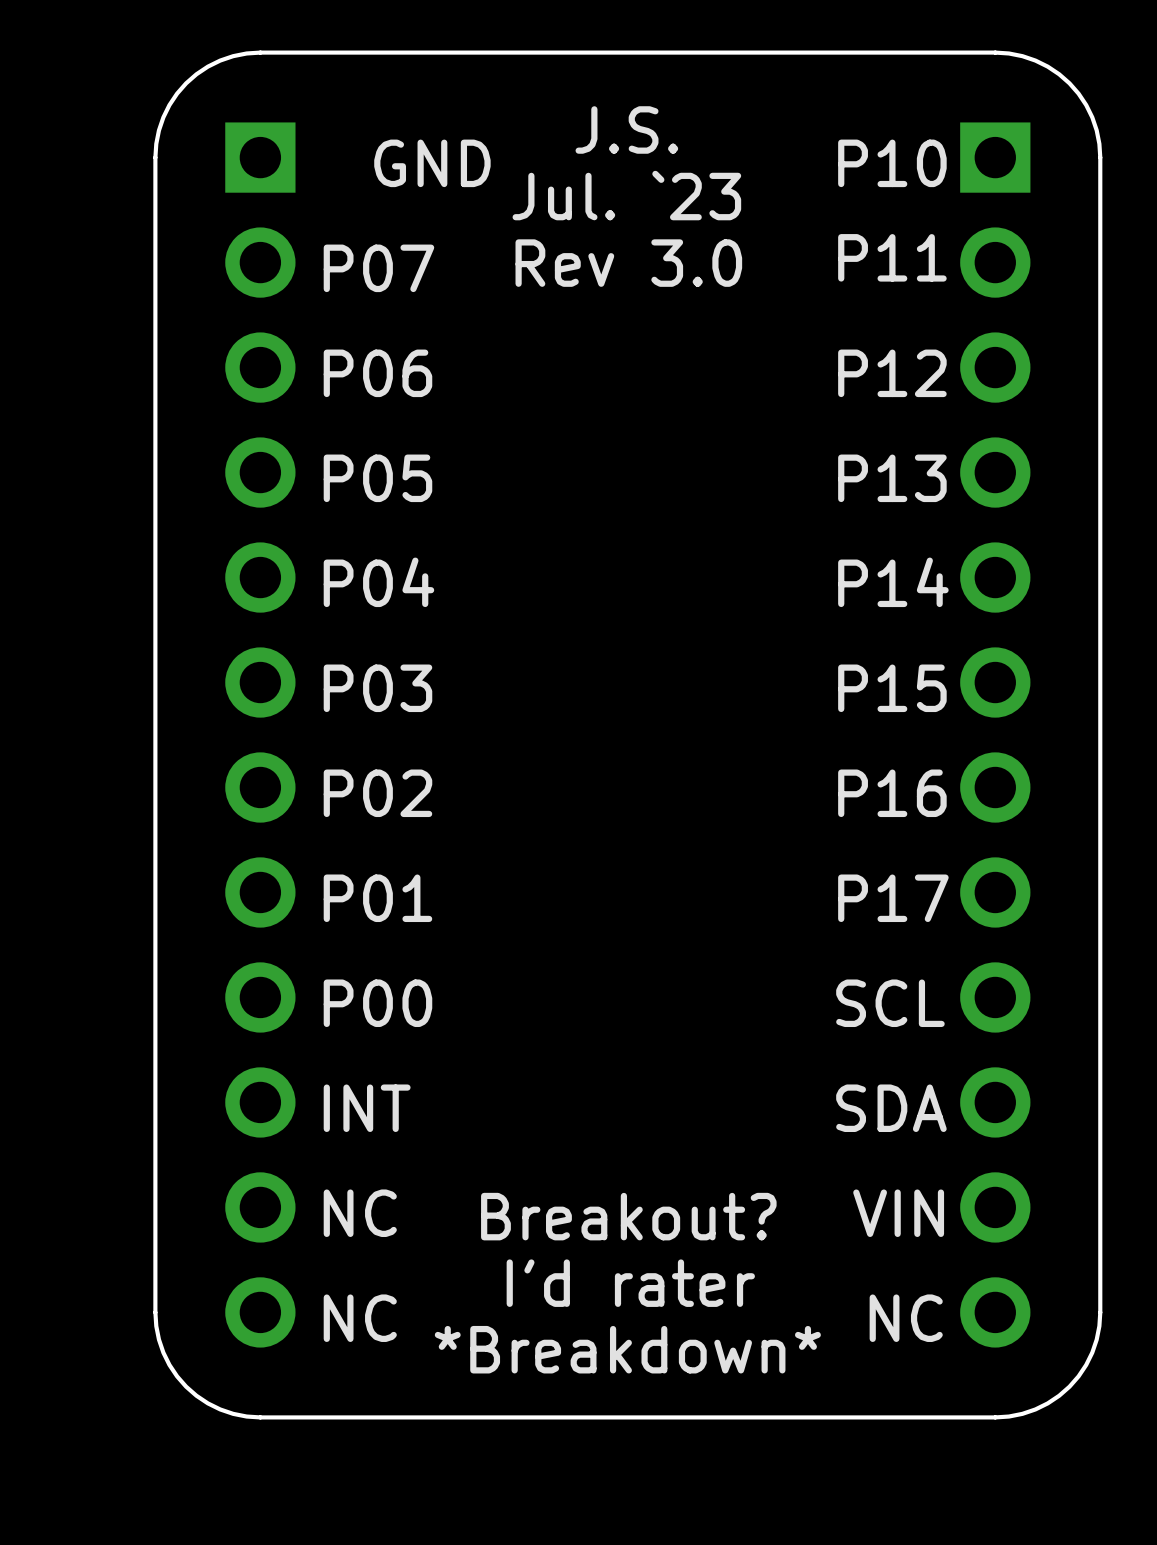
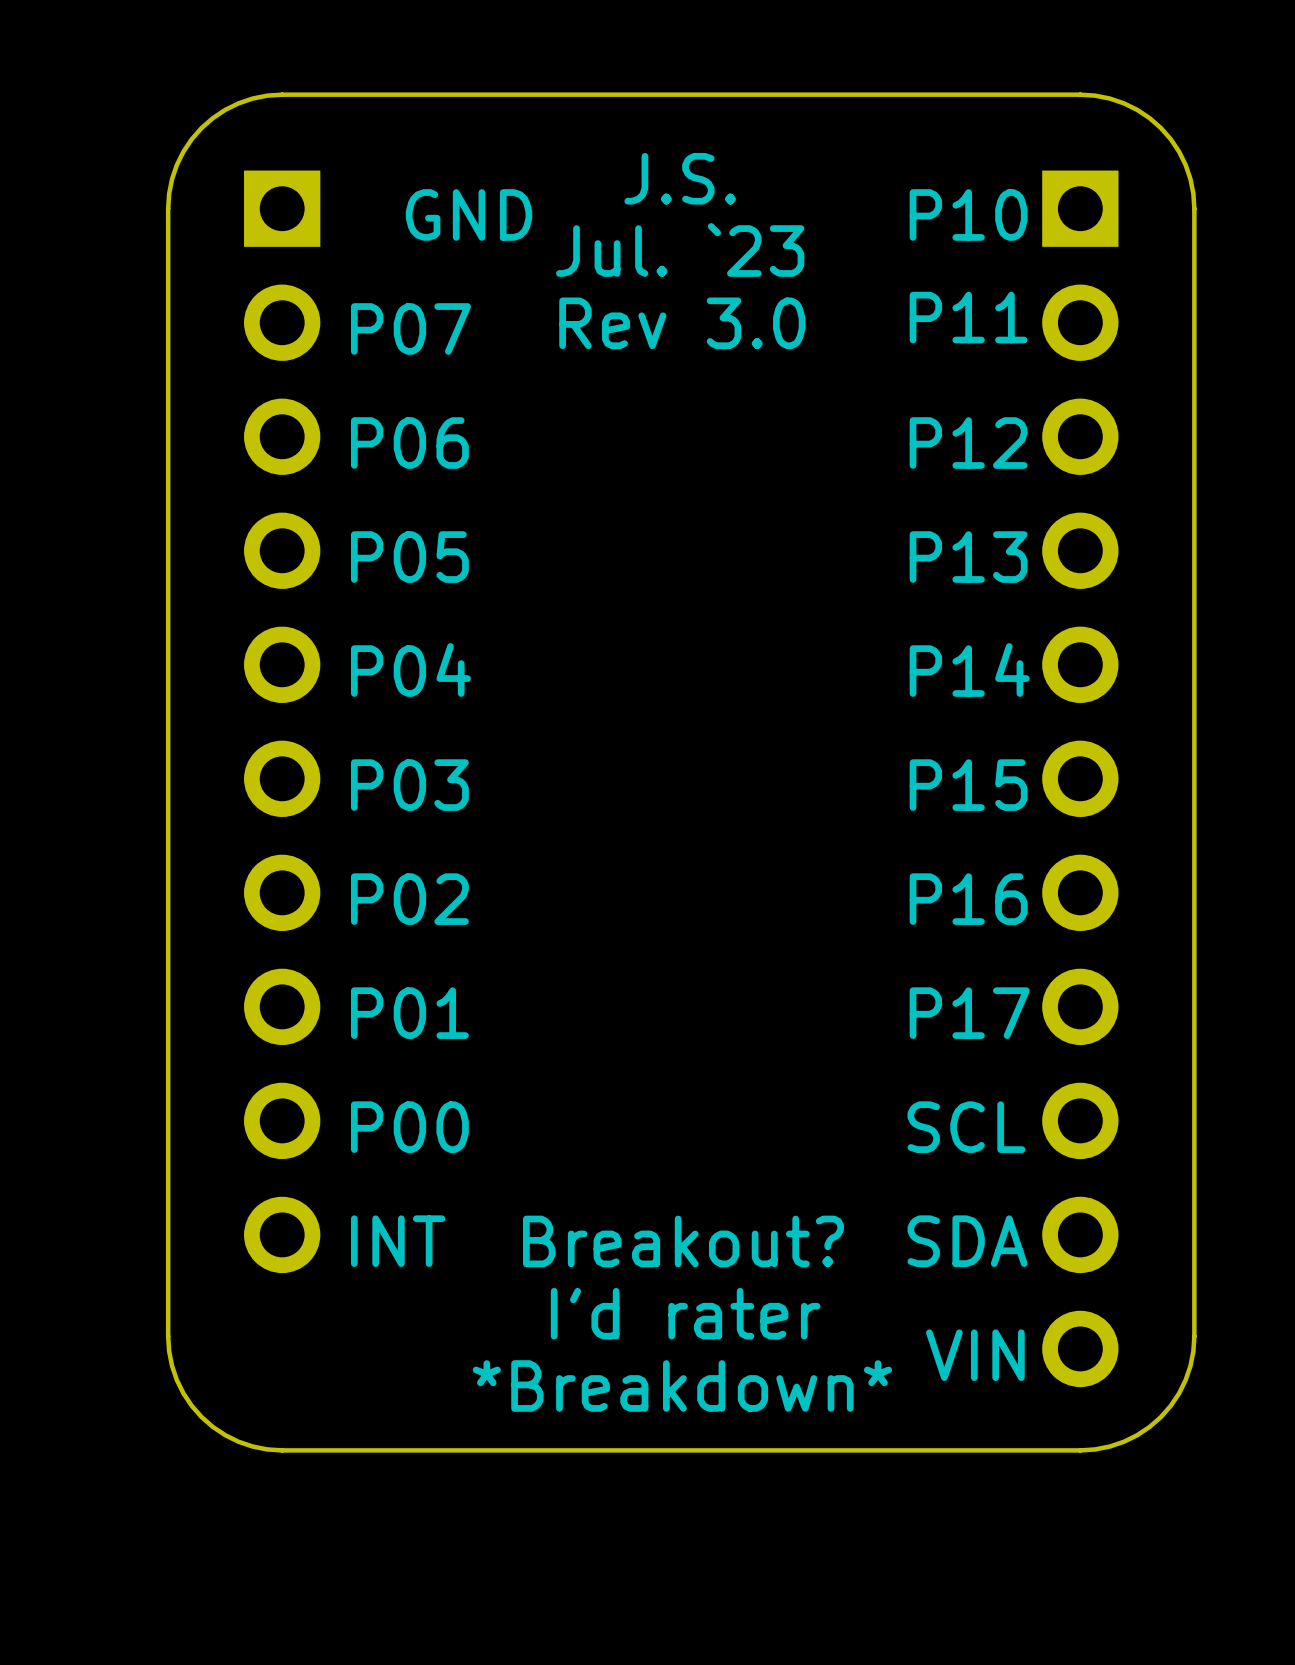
part: (260, 735) -> none
part: (995, 735) -> none
board edge: (1100, 1195) (1100, 1312) (1096, 1339) (1092, 1352) (1078, 1376) (1069, 1386) (1047, 1403) (1022, 1413) (995, 1417) (260, 1417) (233, 1413) (220, 1409) (196, 1395) (177, 1376) (163, 1352) (156, 1326) (155, 1312) (155, 1195) -> (1194, 1336) (1190, 1365) (1185, 1380) (1170, 1405) (1160, 1417) (1137, 1435) (1123, 1441) (1095, 1449) (1080, 1450) (267, 1449) (238, 1441) (225, 1435) (201, 1417) (191, 1405) (176, 1380) (169, 1351) (168, 1336)
text: NC (360, 1213) -> none
text position: Breakout? (628, 1216) -> Breakout? (683, 1241)
text position: I'd rater (630, 1283) -> I'd rater (685, 1313)
text: NC (360, 1318) -> none
text: NC (906, 1318) -> none
text position: *Breakdown* (627, 1349) -> *Breakdown* (682, 1385)

